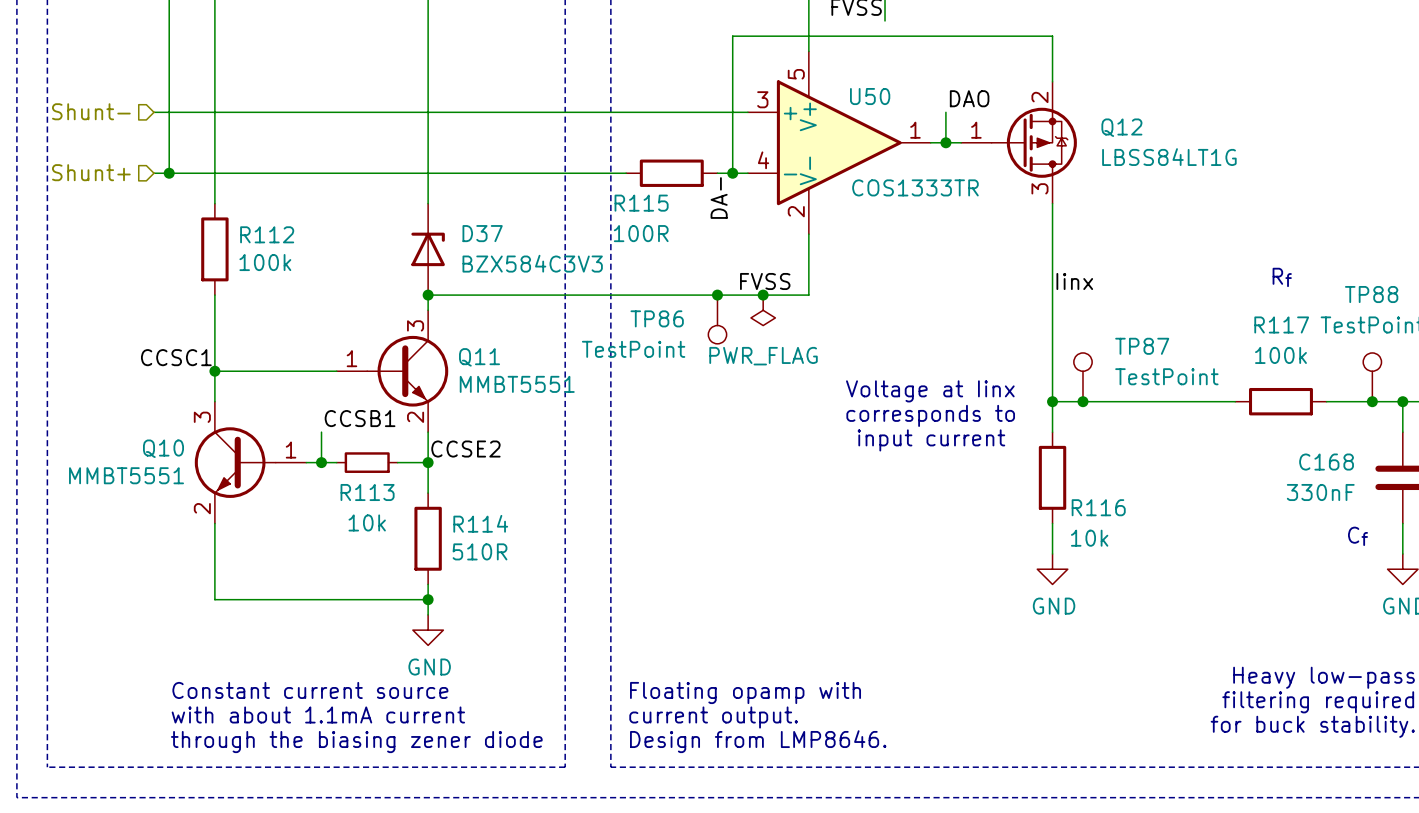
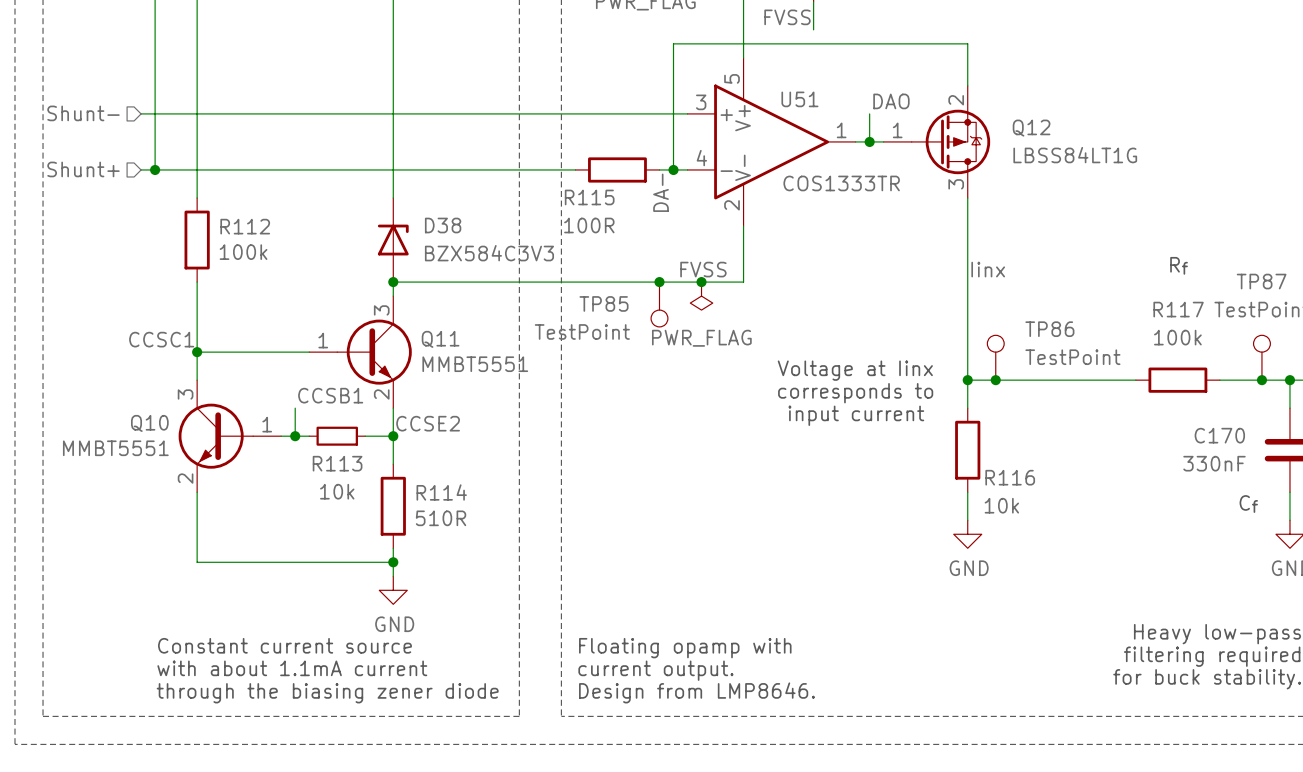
U50 name: U50 (870, 96) -> U51 (799, 99)
D37 name: D37 (482, 233) -> D38 (443, 225)
TP88 name: TP88 (1371, 294) -> TP87 (1261, 281)
TP86 name: TP86 (657, 318) -> TP85 (604, 303)
TP87 name: TP87 (1142, 346) -> TP86 (1049, 329)
C168 name: C168 (1326, 462) -> C170 (1219, 435)

